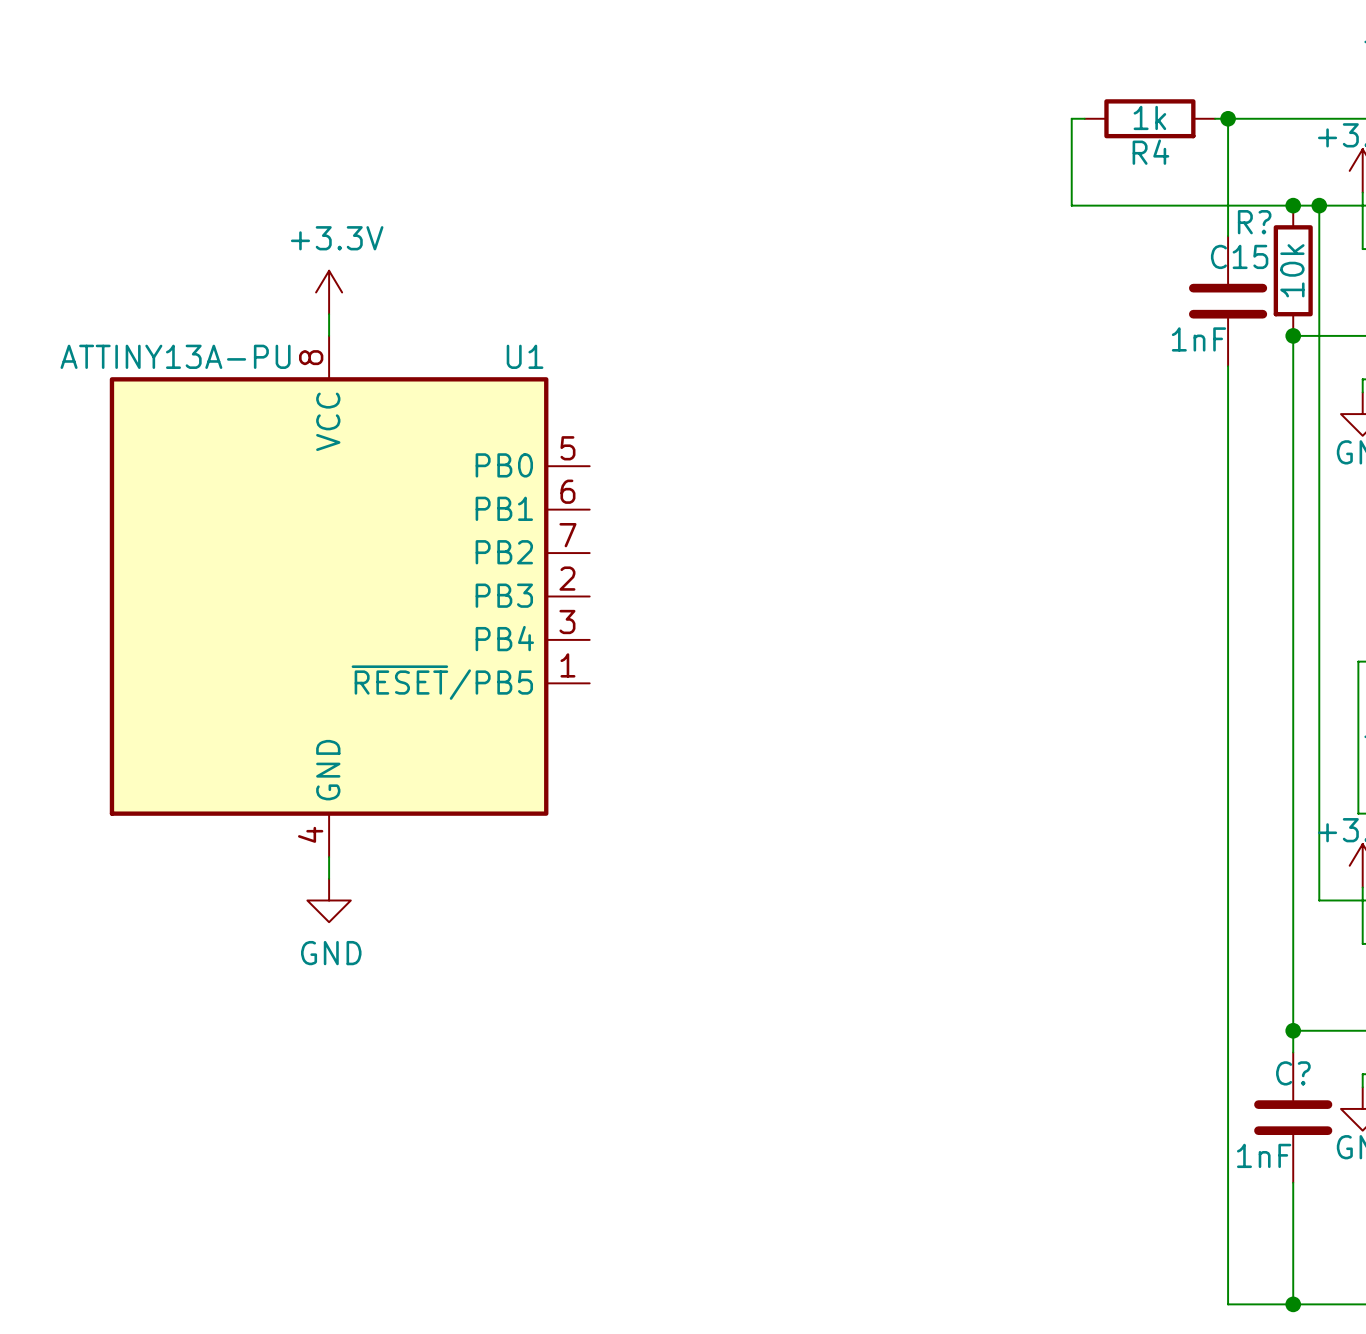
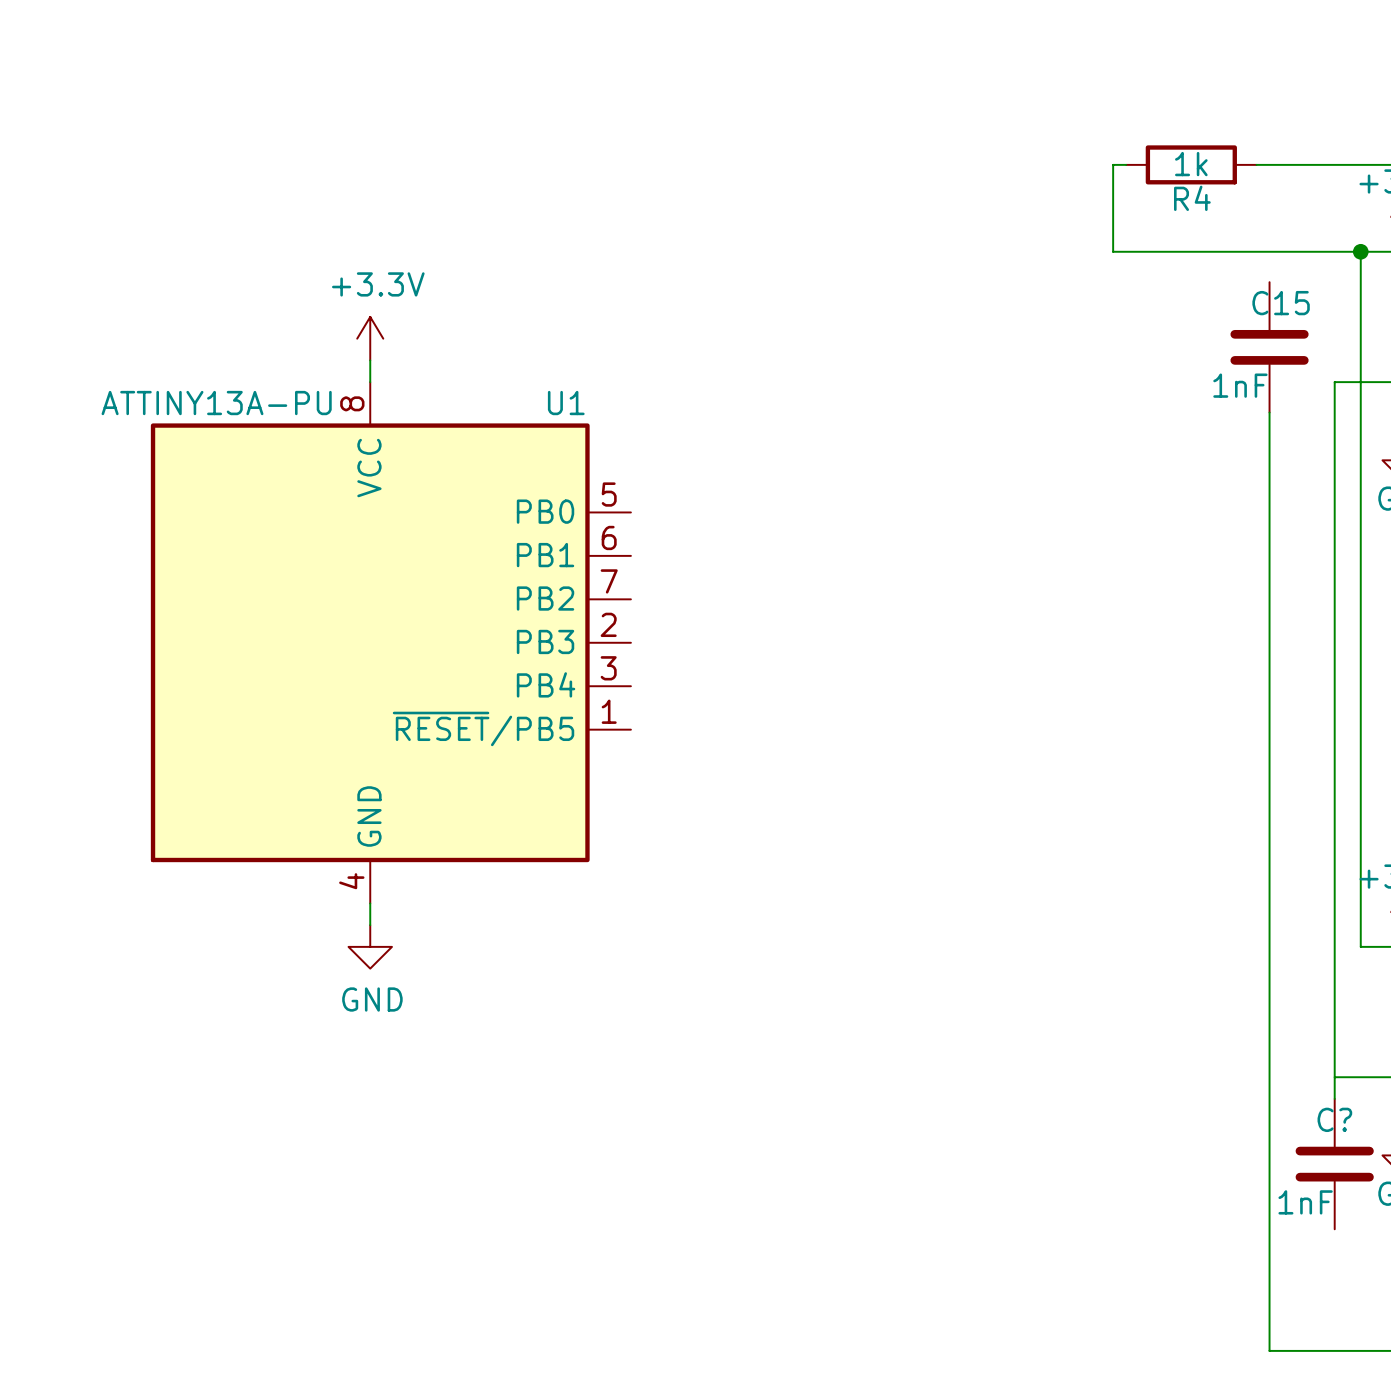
wire: (1228, 118) (1228, 236) -> none
junction: (1228, 118) -> none
junction: (1293, 205) -> none
R?: 10k (1293, 270) -> none
junction: (1293, 335) -> none
junction: (1293, 1030) -> none
wire: (1293, 1182) (1293, 1304) -> none
junction: (1293, 1304) -> none

